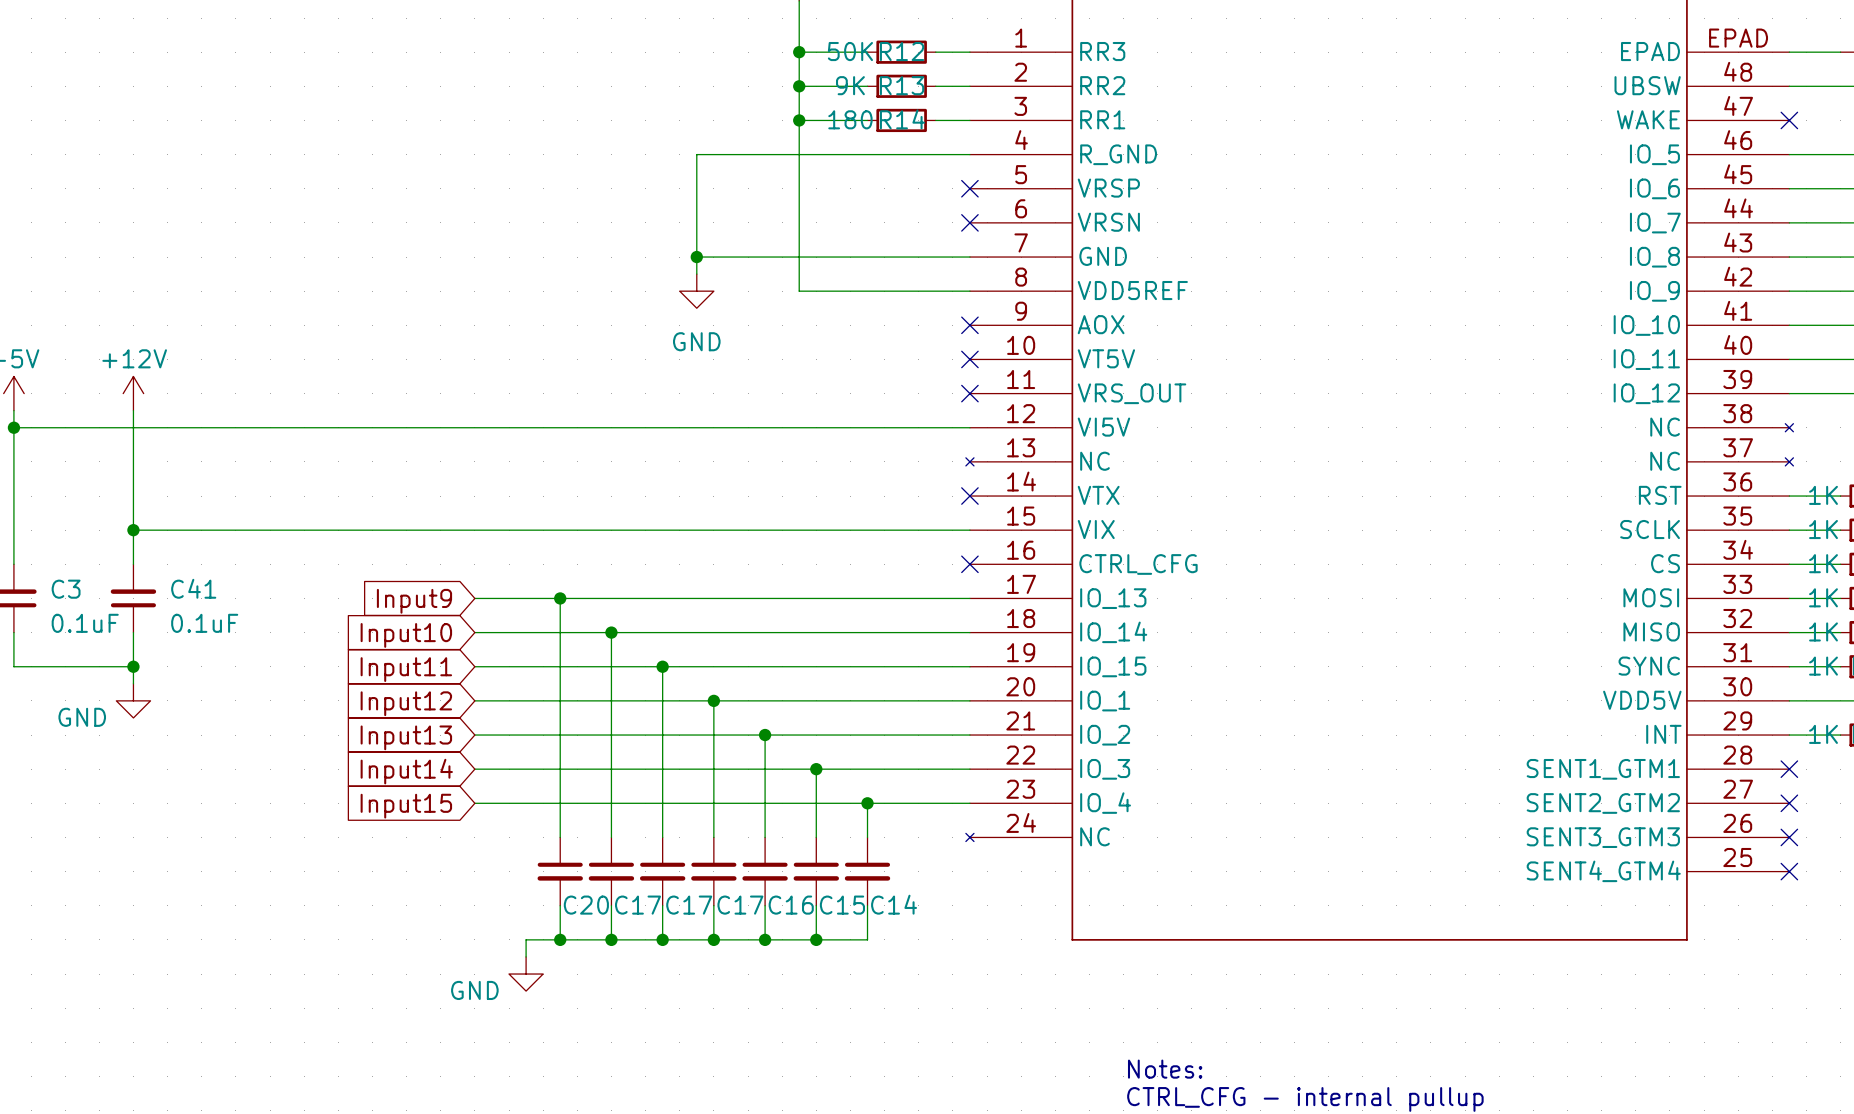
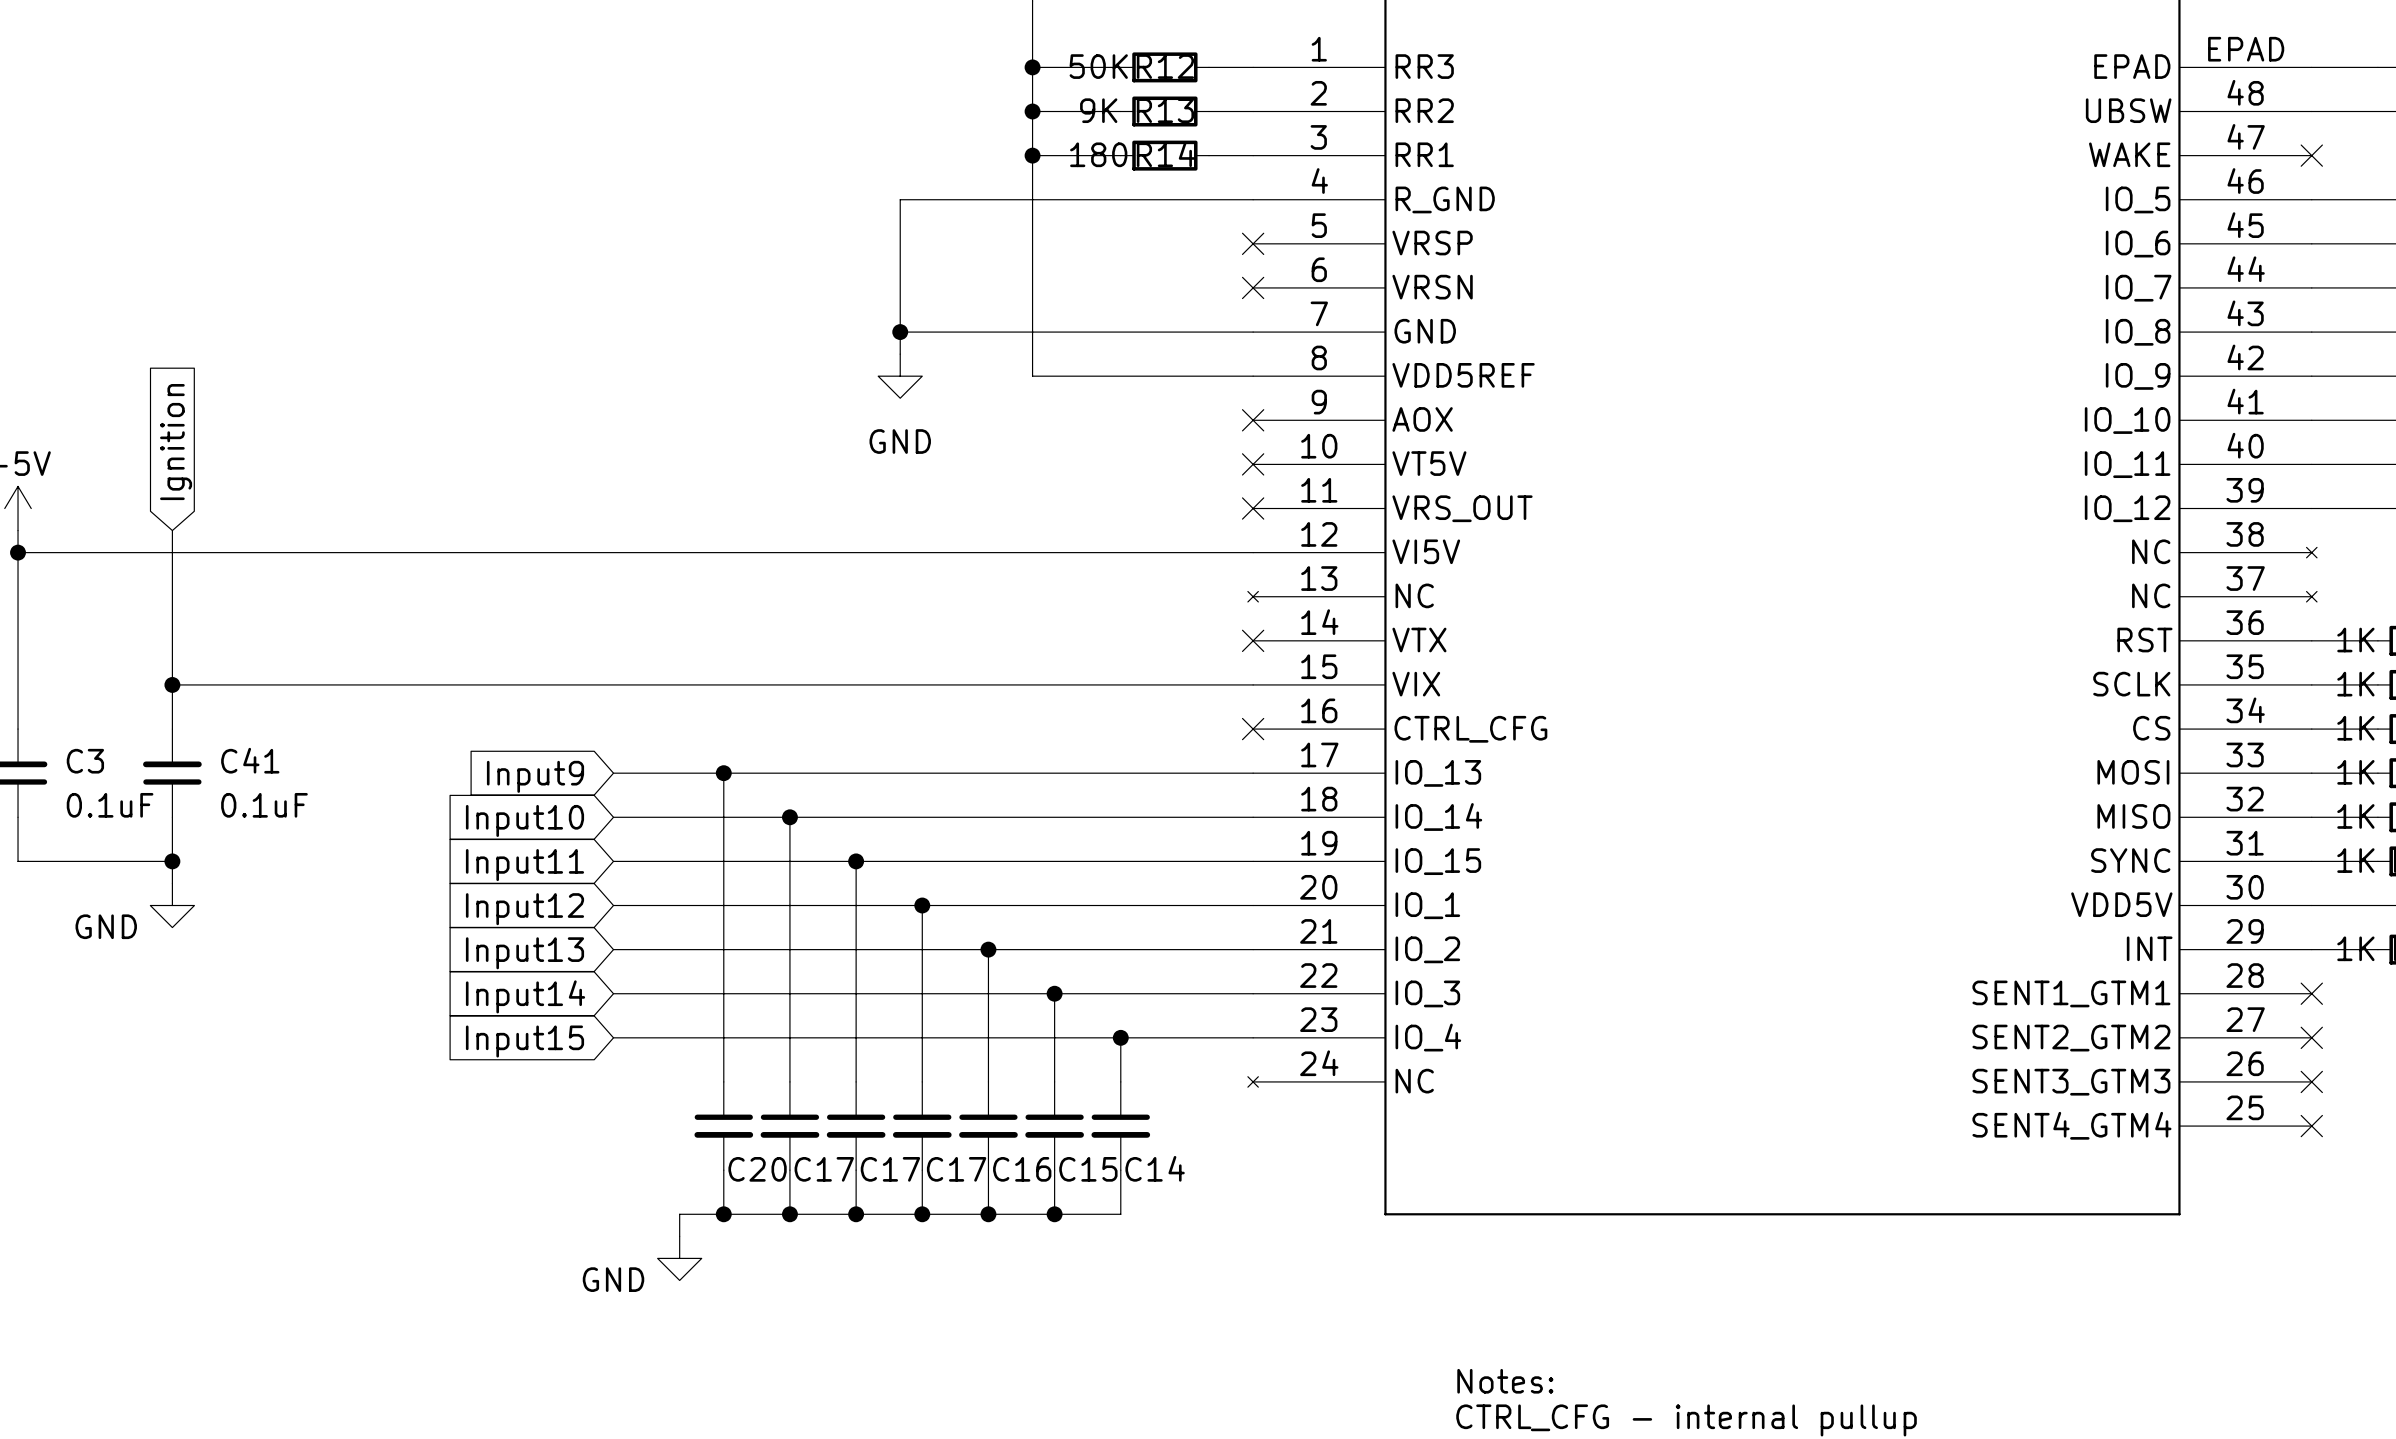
global label: none -> Ignition (176, 442)
power symbol: +12V (133, 393) -> none

